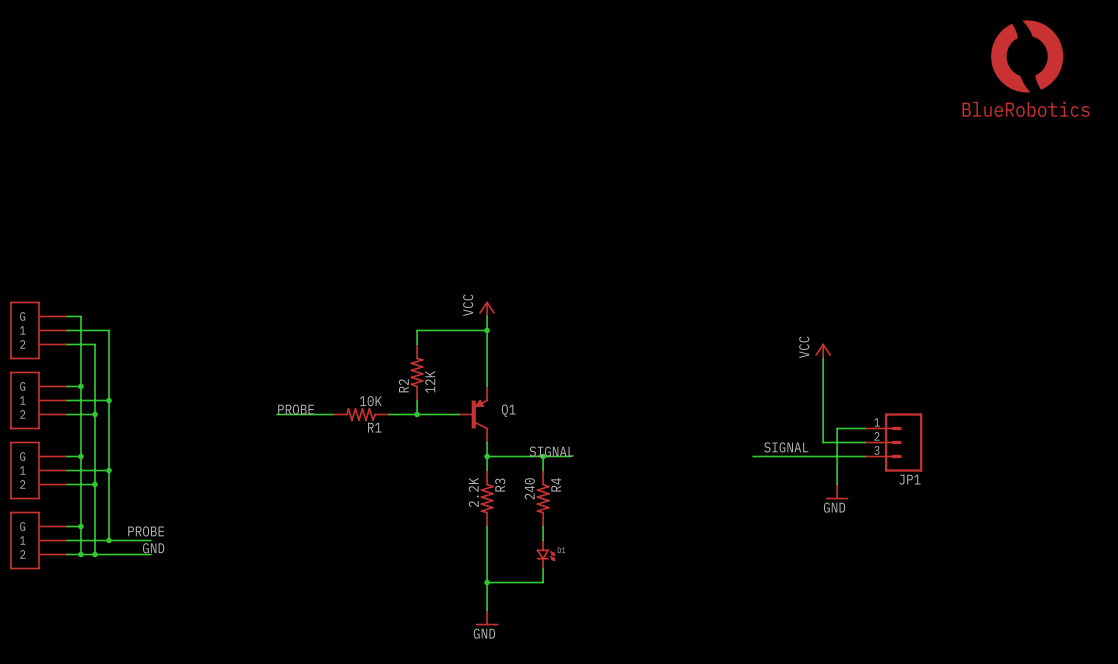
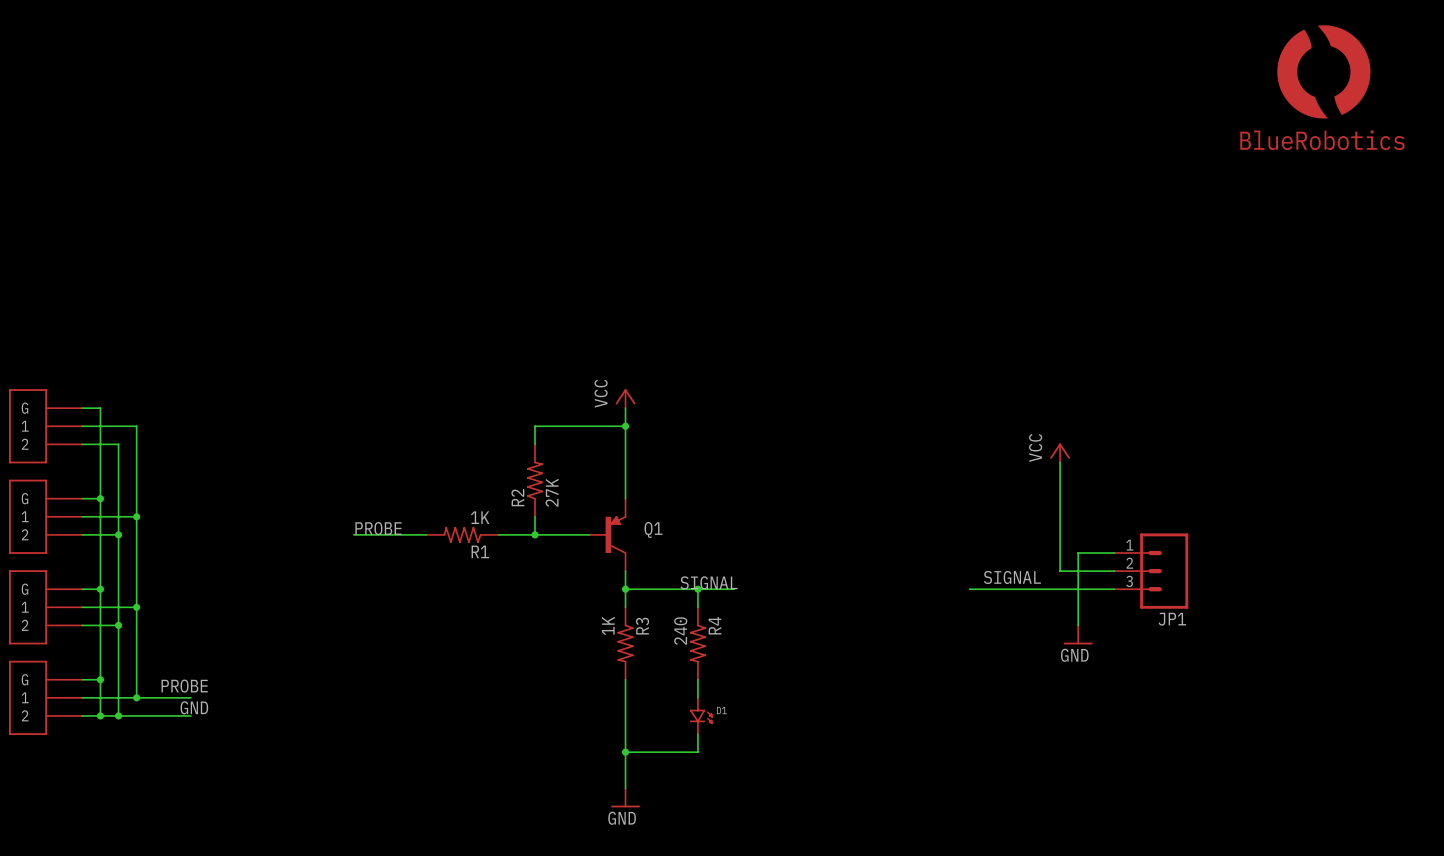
R2 value: 12K (430, 381) -> 27K (552, 492)
R1 value: 10K (370, 401) -> 1K (480, 517)
R3 value: 2.2K (473, 492) -> 1K (608, 625)

